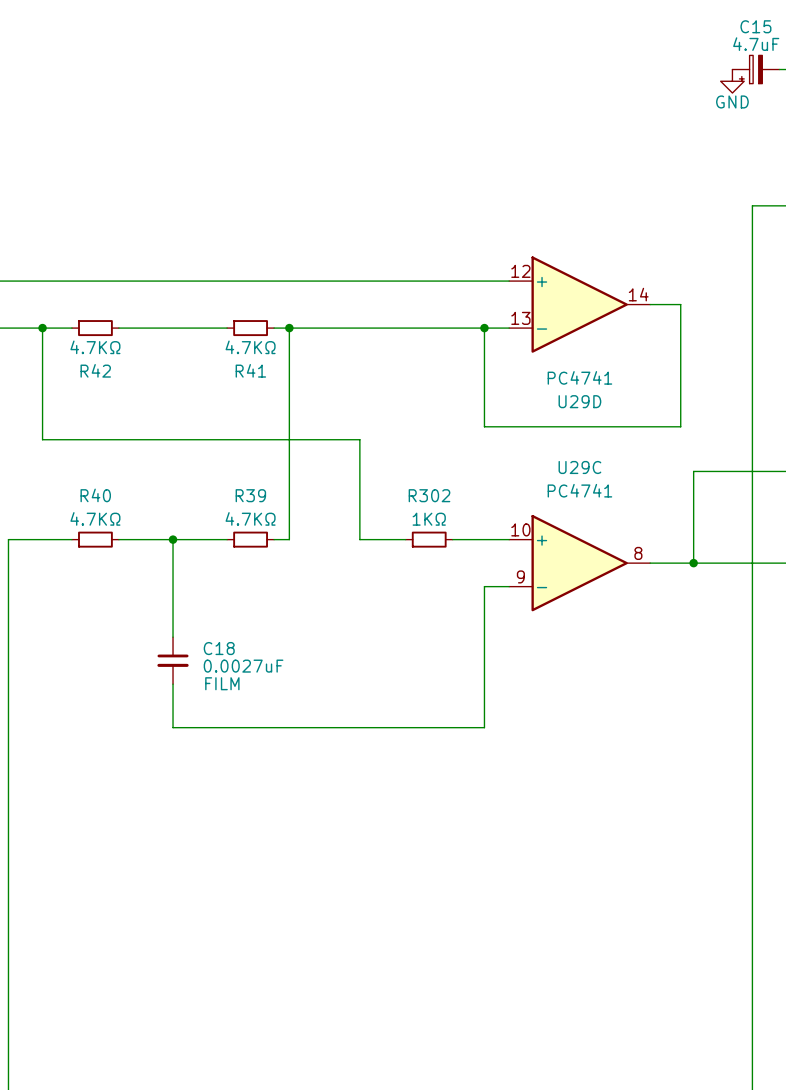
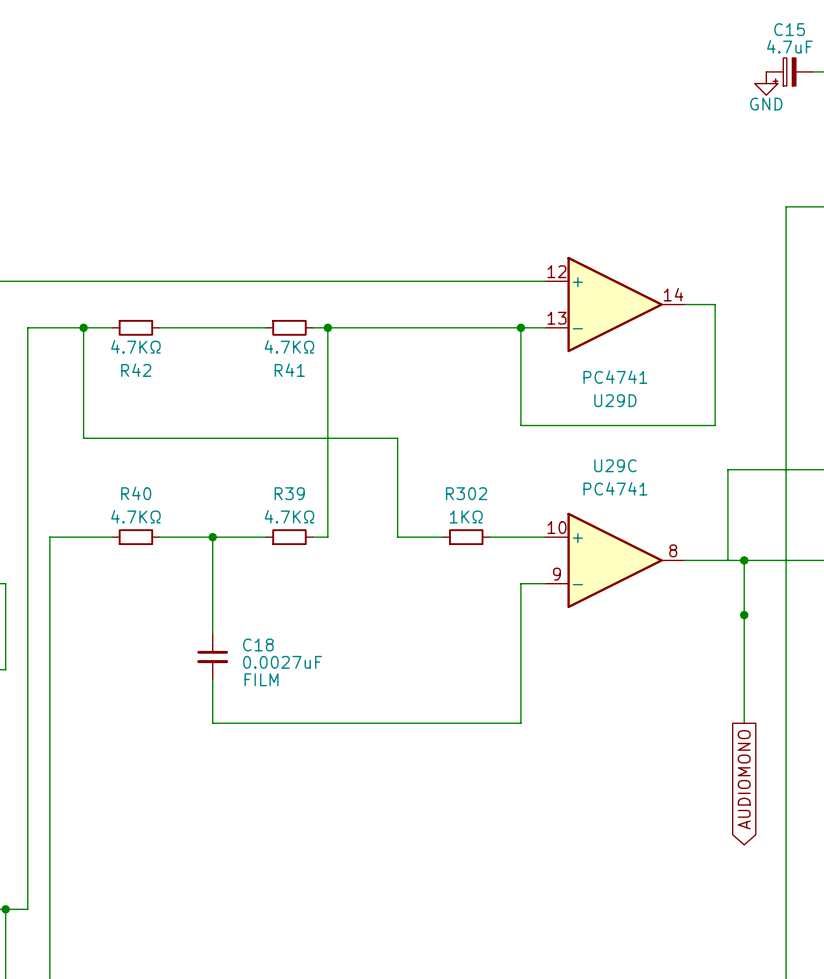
junction position: (693, 563) -> (744, 560)
wire: none -> (744, 560) (744, 723)
junction: none -> (744, 615)
global label: none -> AUDIOMONO (744, 779)

